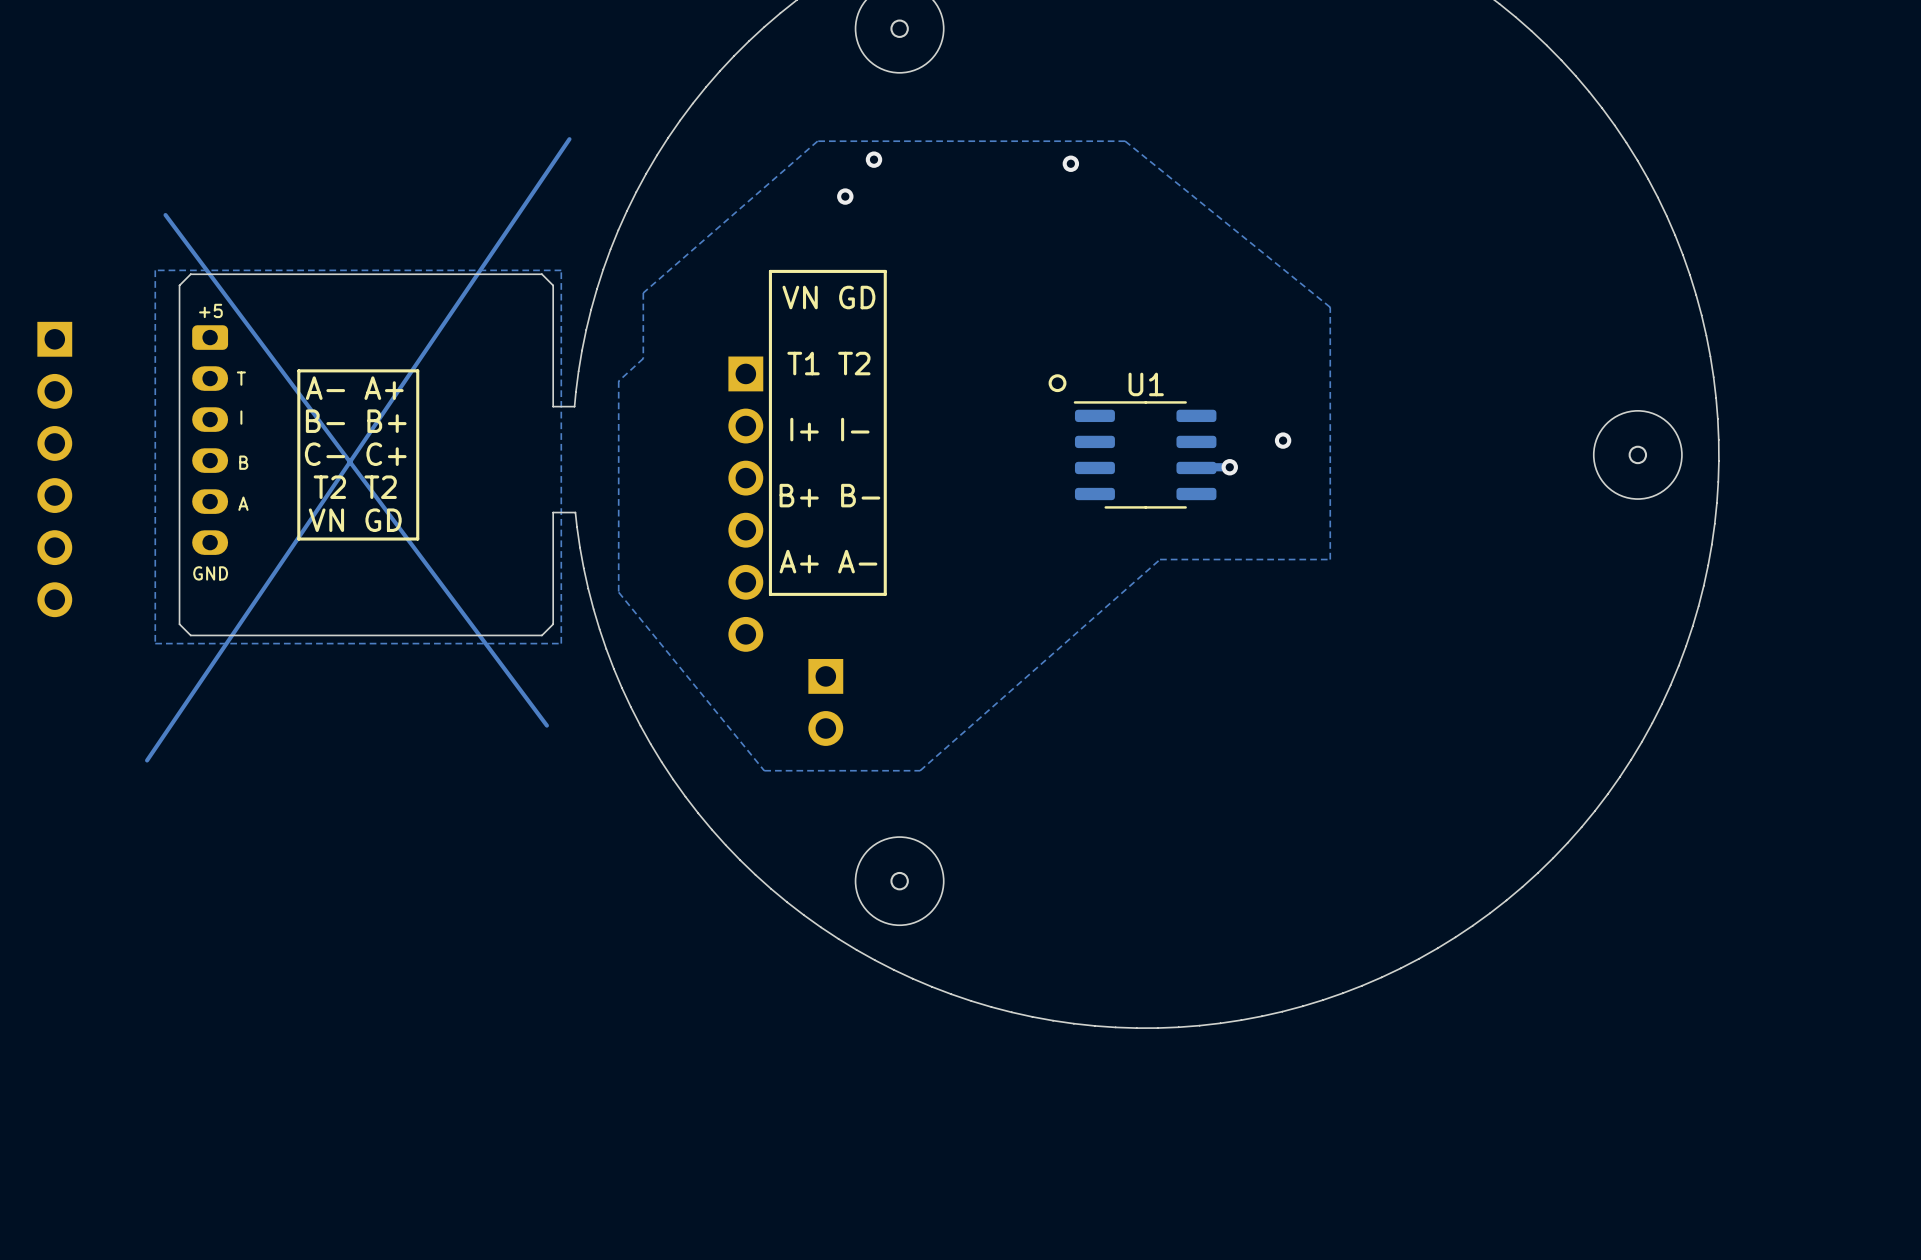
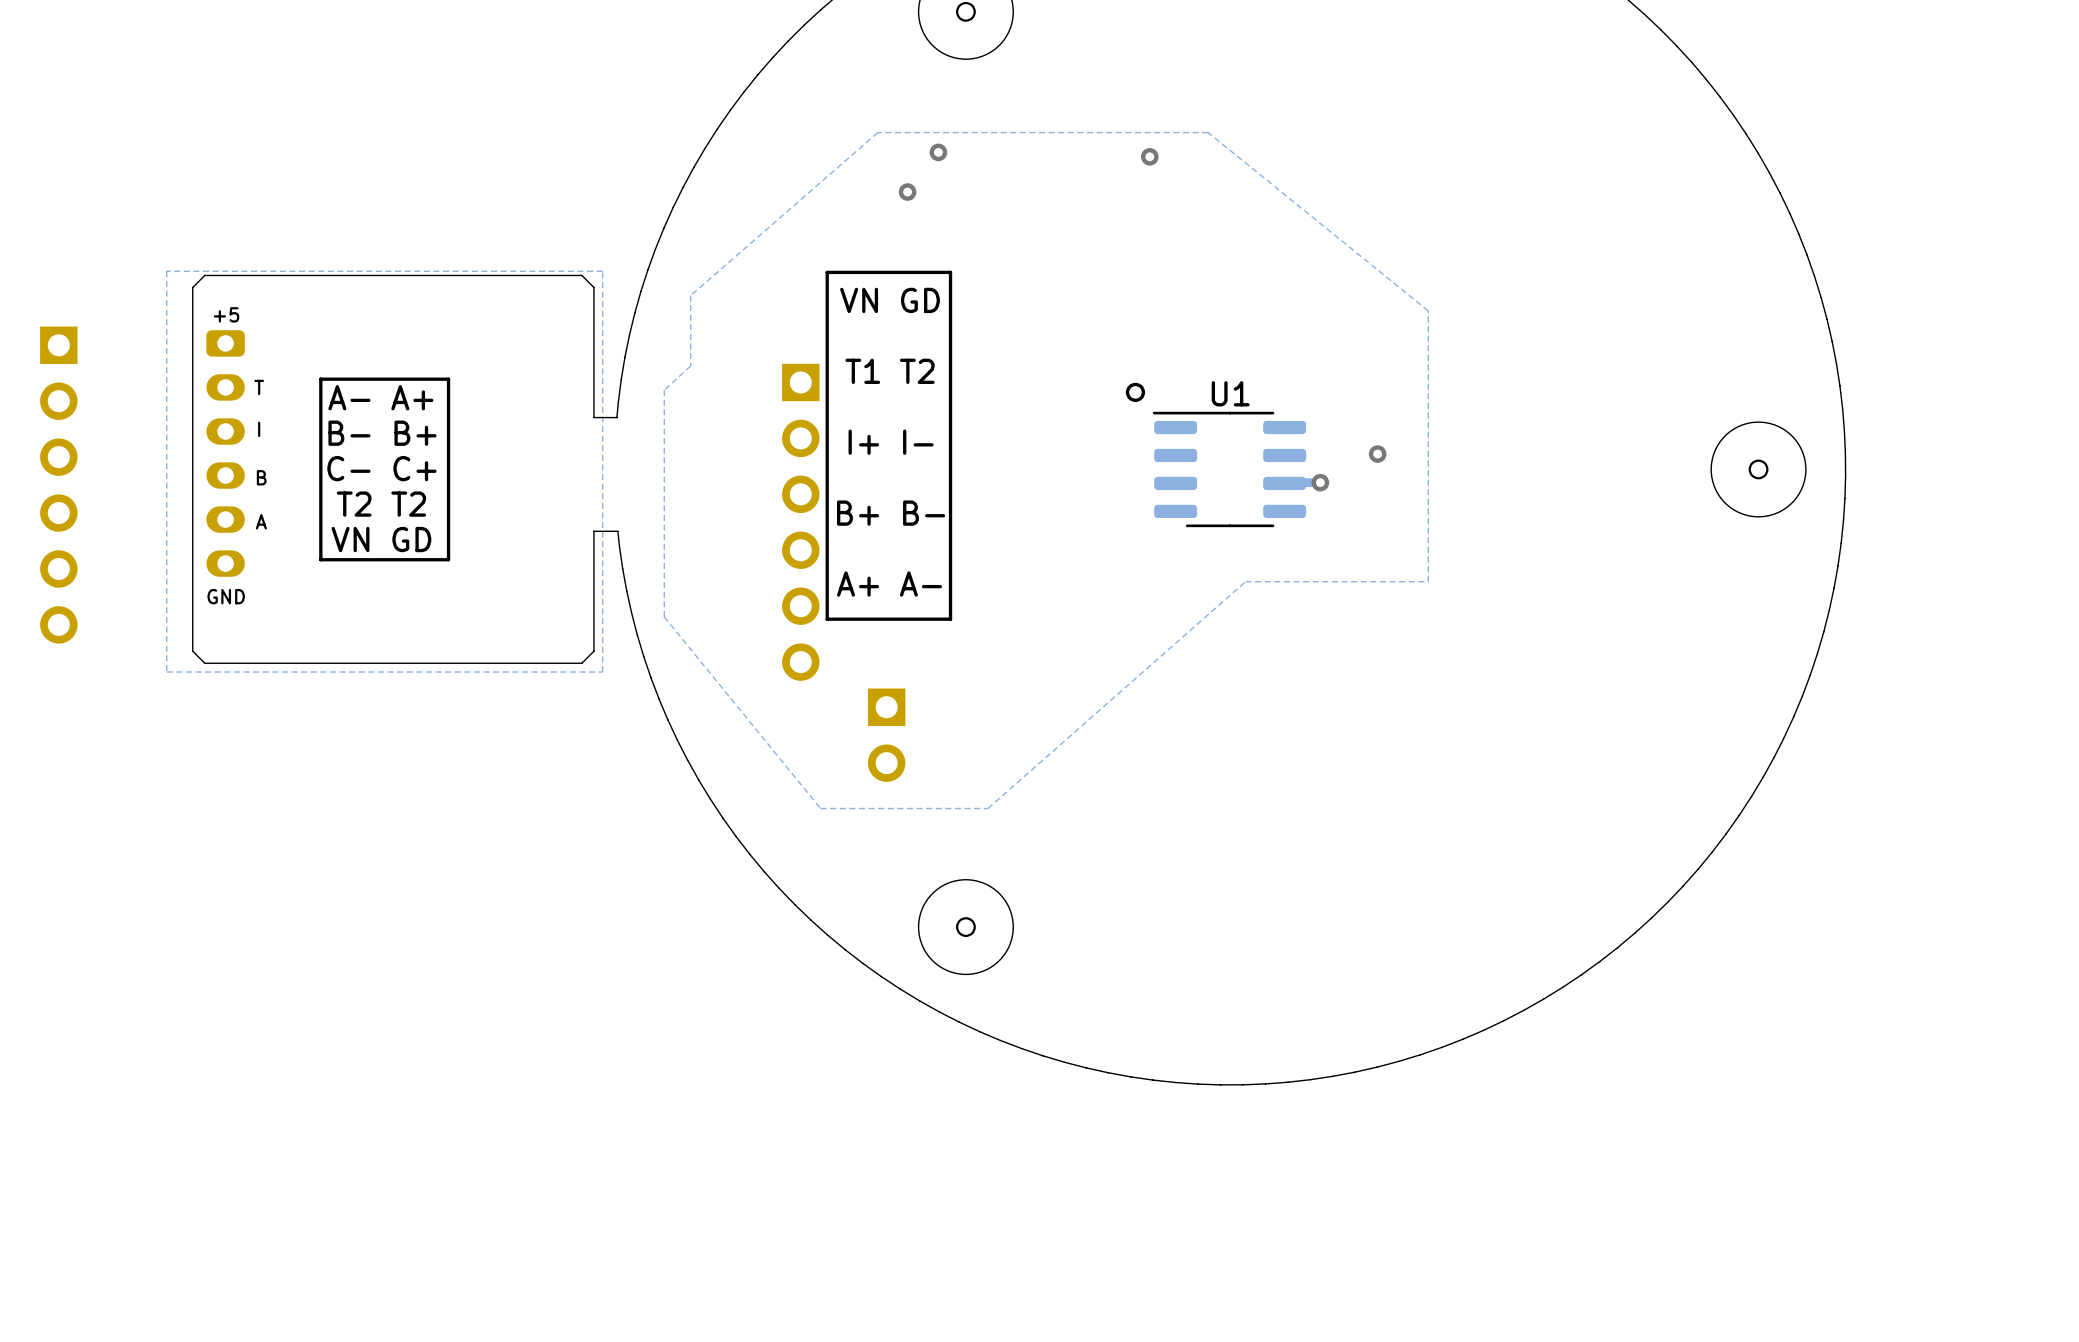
track: (569, 139) (147, 760) -> none
track: (165, 215) (546, 725) -> none

